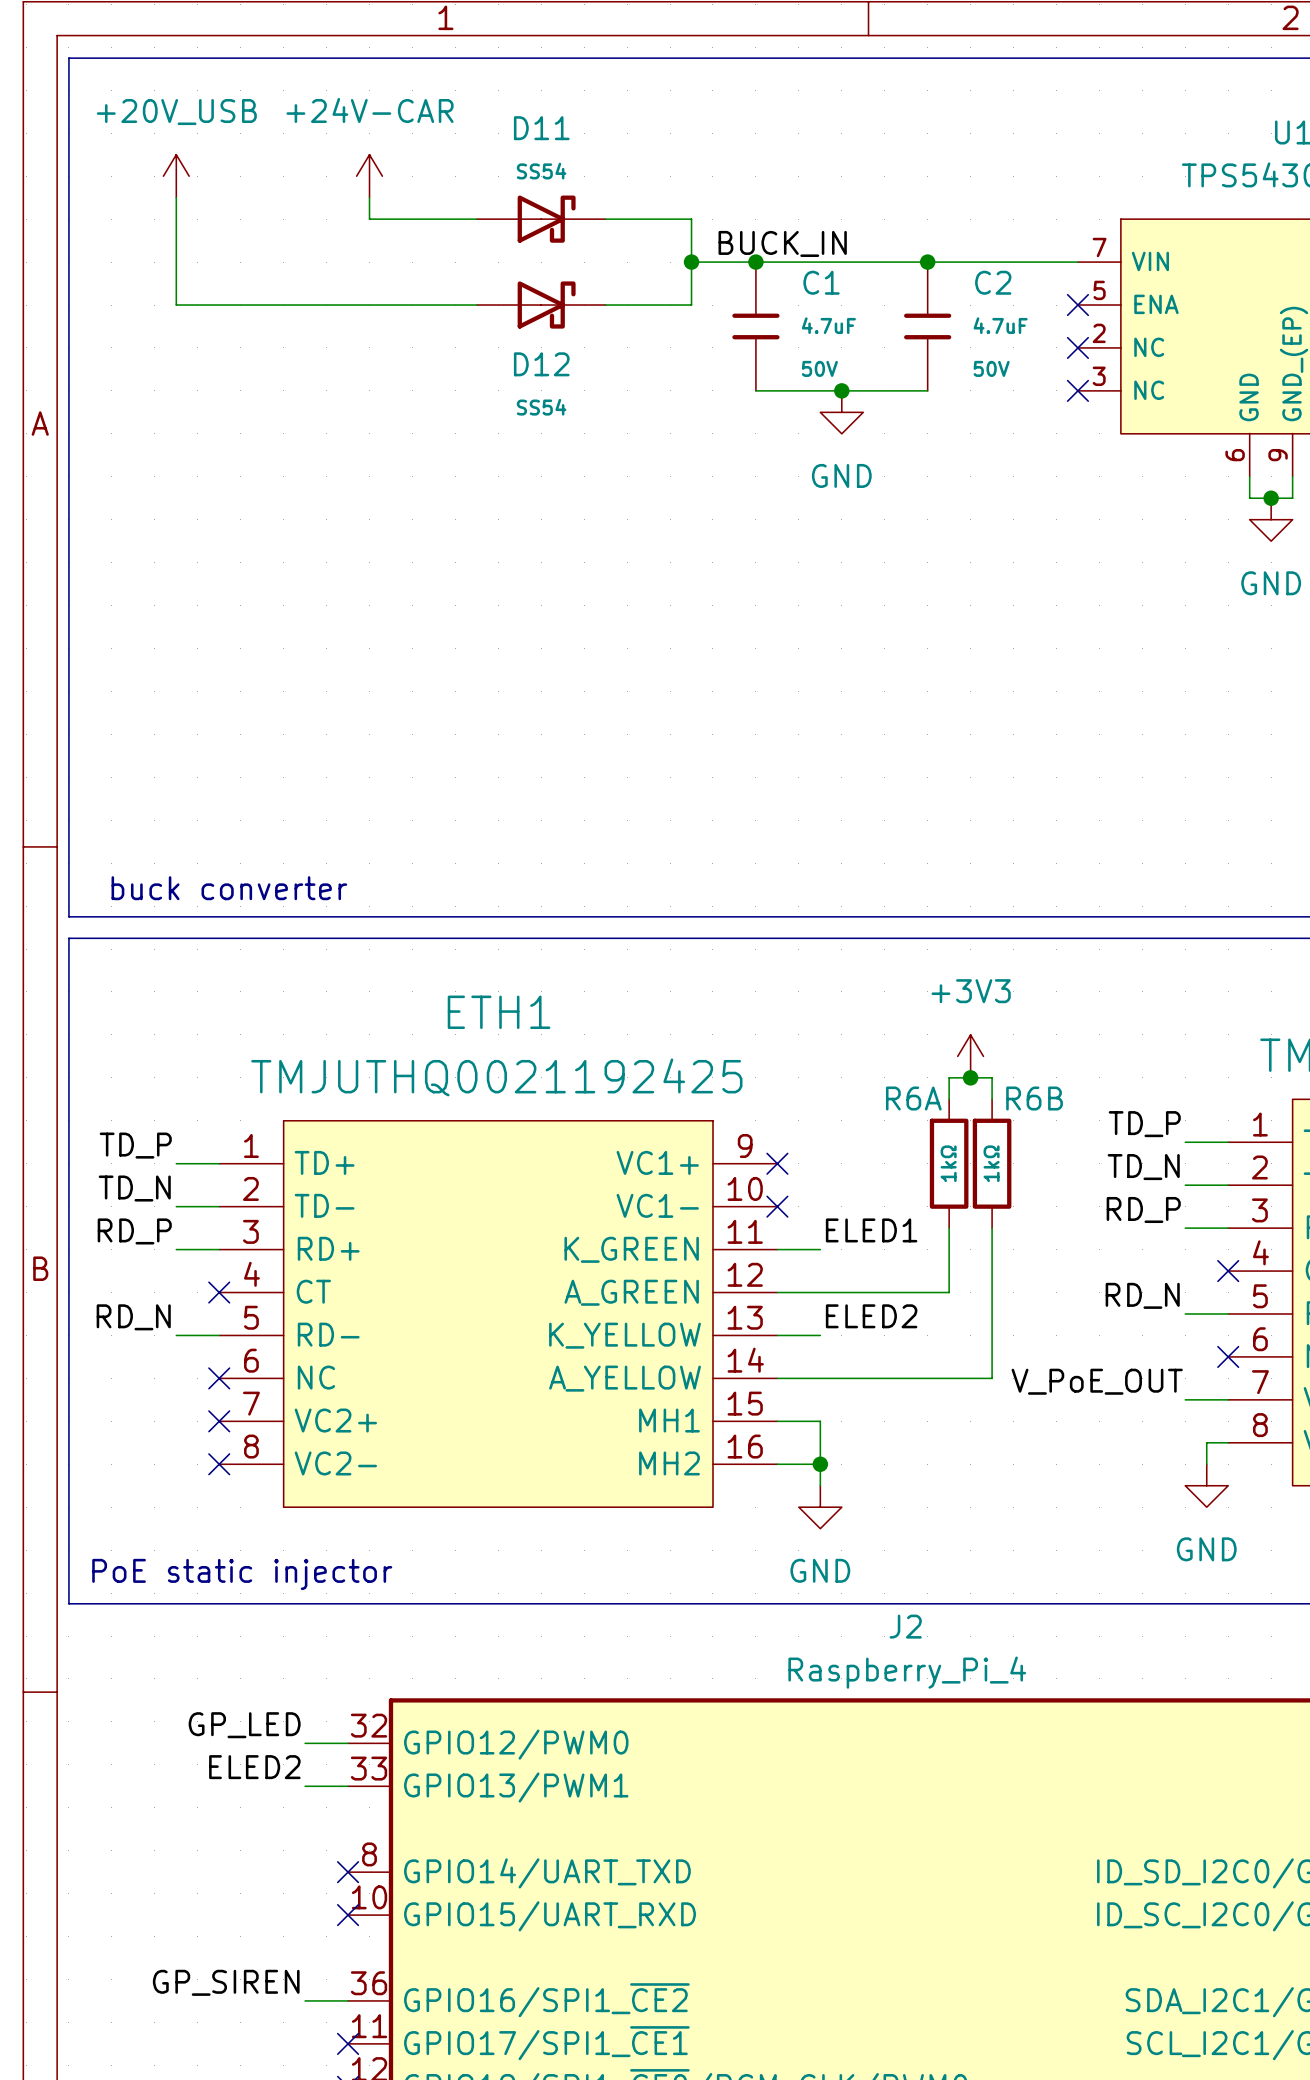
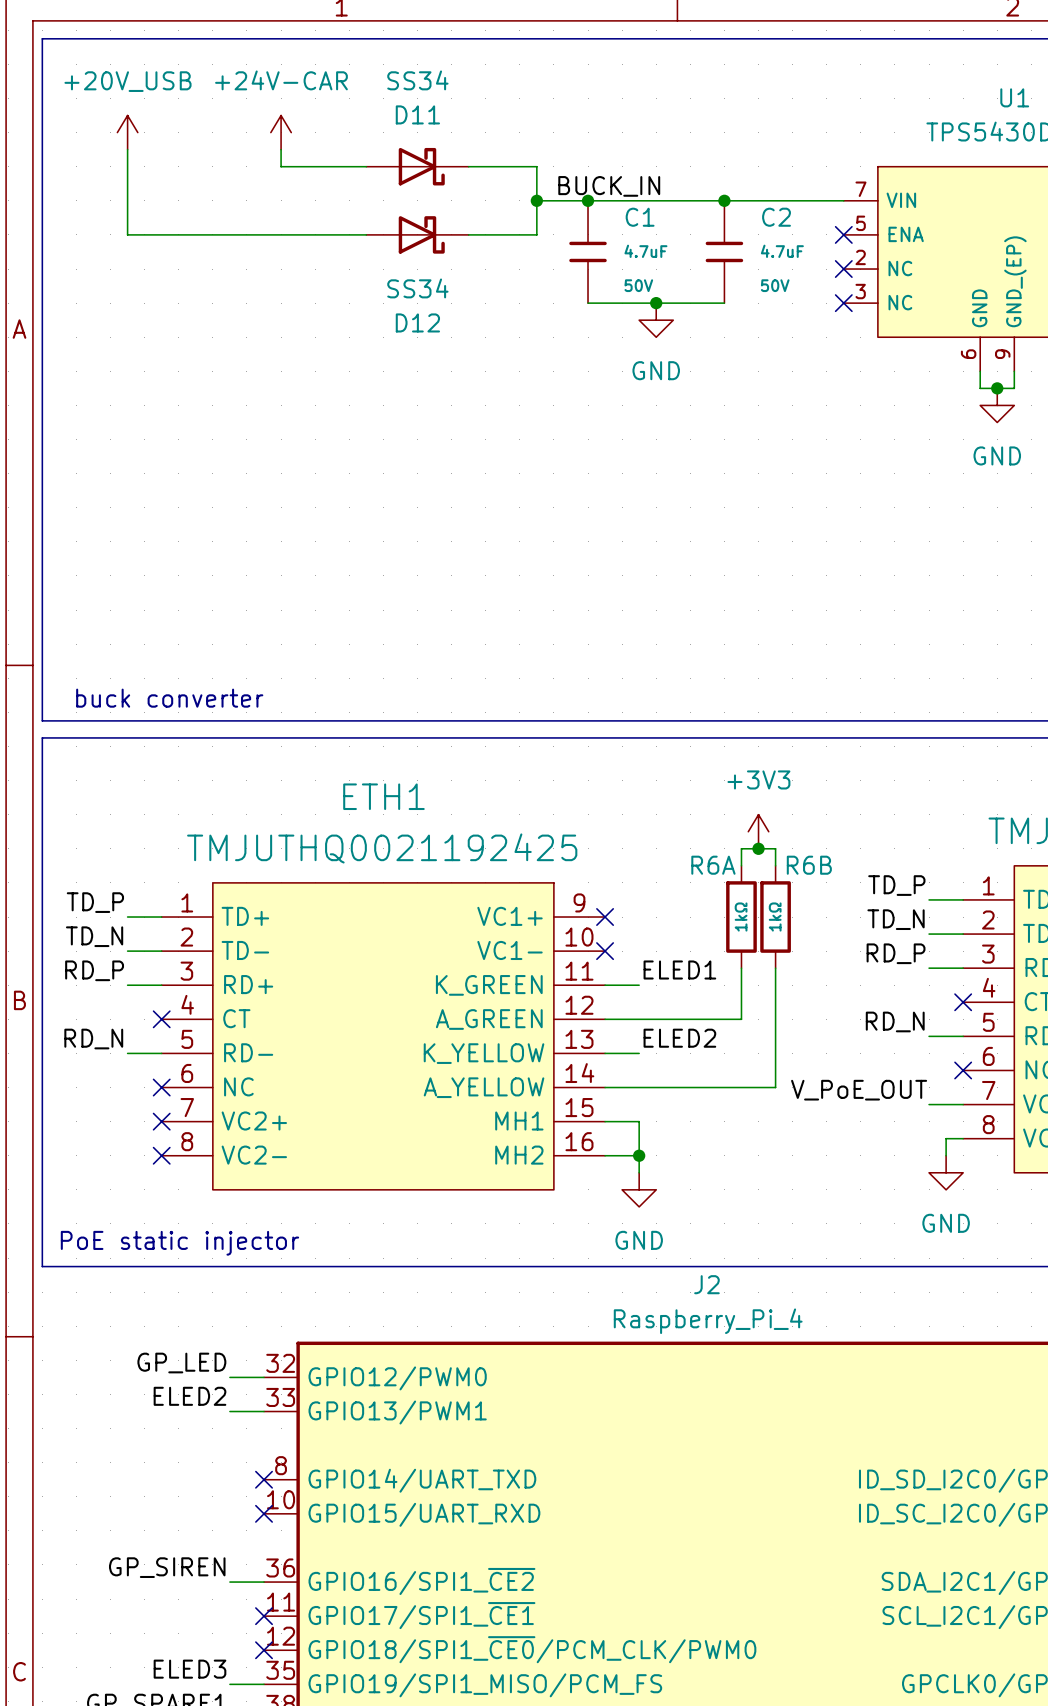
D11 value: SS54 (541, 171) -> SS34 (417, 80)
D11 symbol: [476, 195, 606, 243] -> [366, 147, 469, 186]
D12 symbol: [476, 281, 606, 329] -> [366, 216, 469, 254]
D12 name position: D12 (541, 364) -> D12 (417, 322)
D12 value: SS54 (541, 407) -> SS34 (417, 288)

